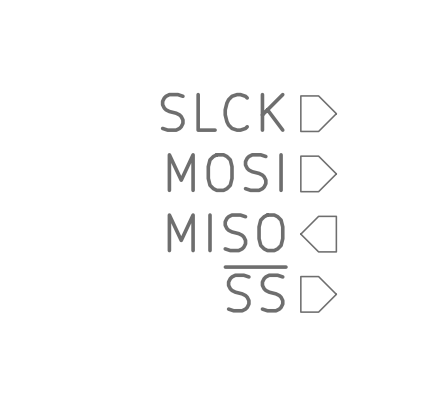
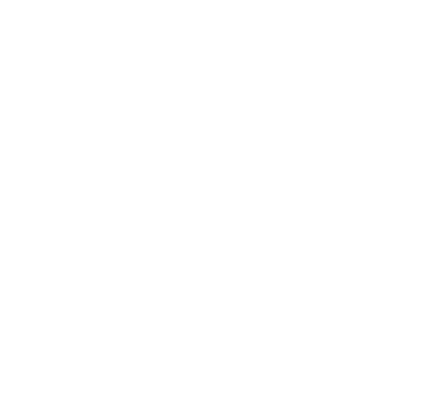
hierarchical label: SLCK (222, 112) -> none
hierarchical label: MOSI (225, 172) -> none
hierarchical label: MISO (226, 232) -> none
hierarchical label: ~{SS} (255, 288) -> none

